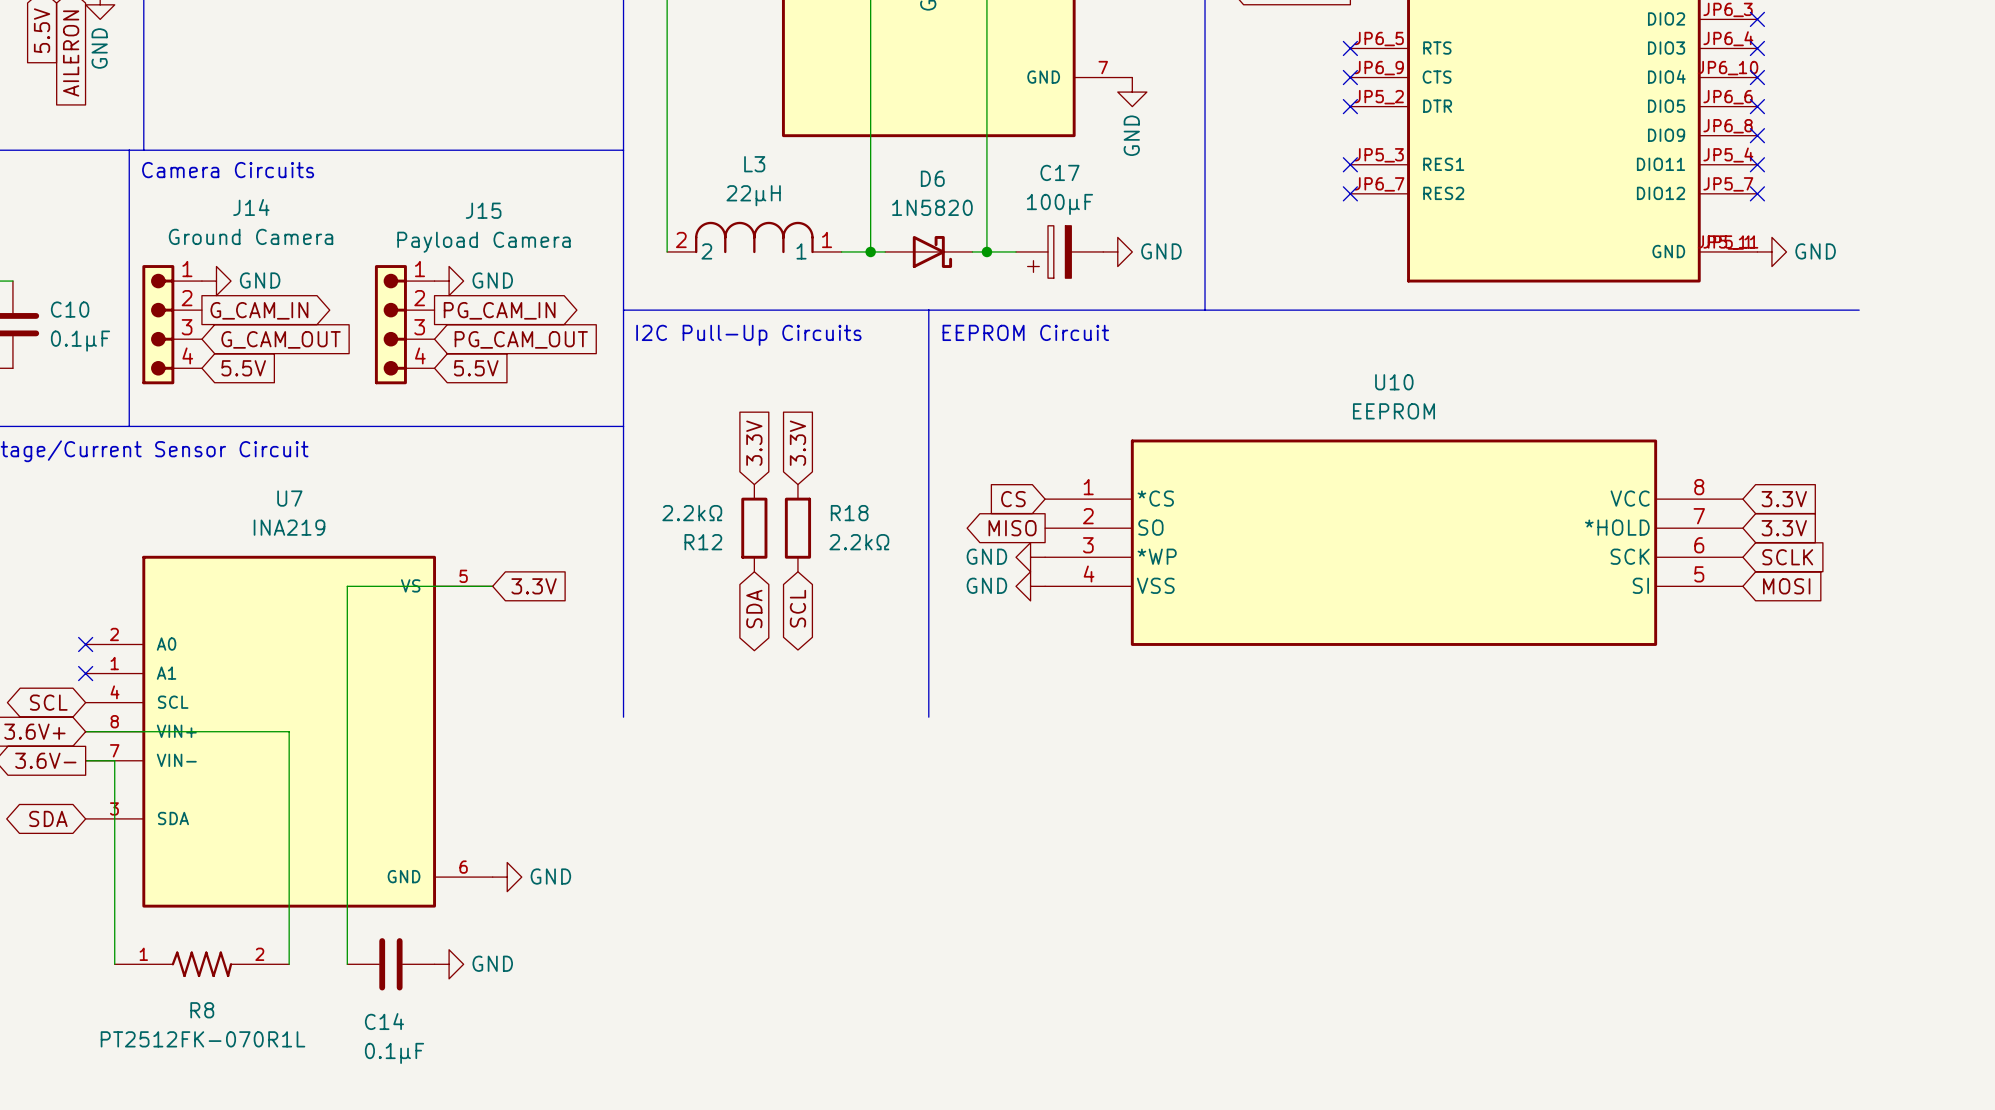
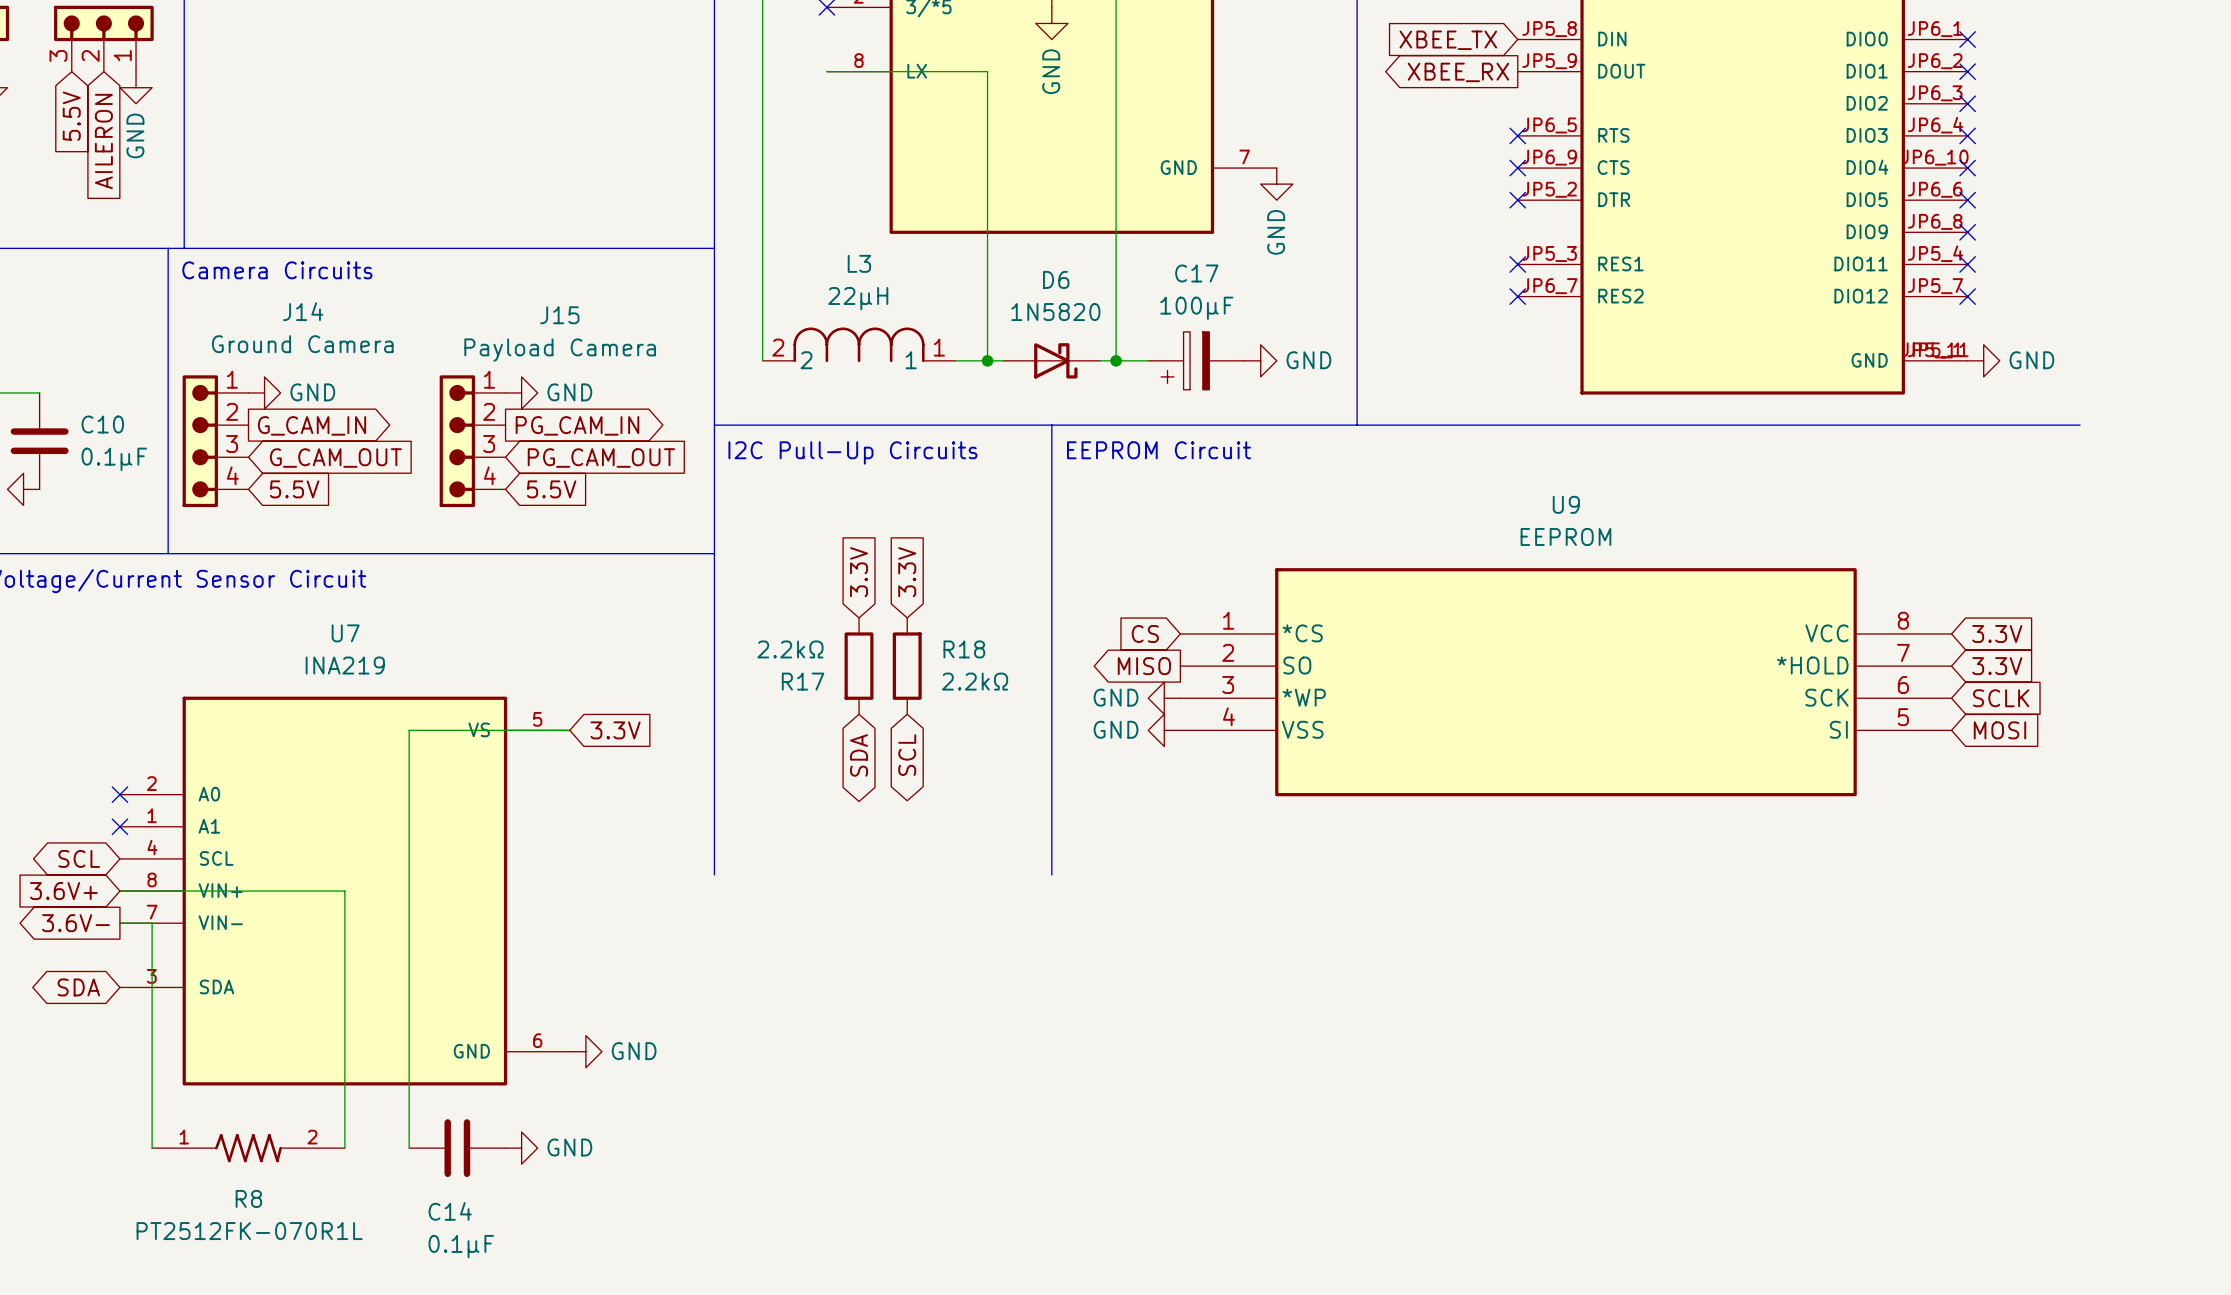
U10 name: U10 (1394, 382) -> U9 (1566, 504)
R12 name: R12 (703, 542) -> R17 (803, 681)

